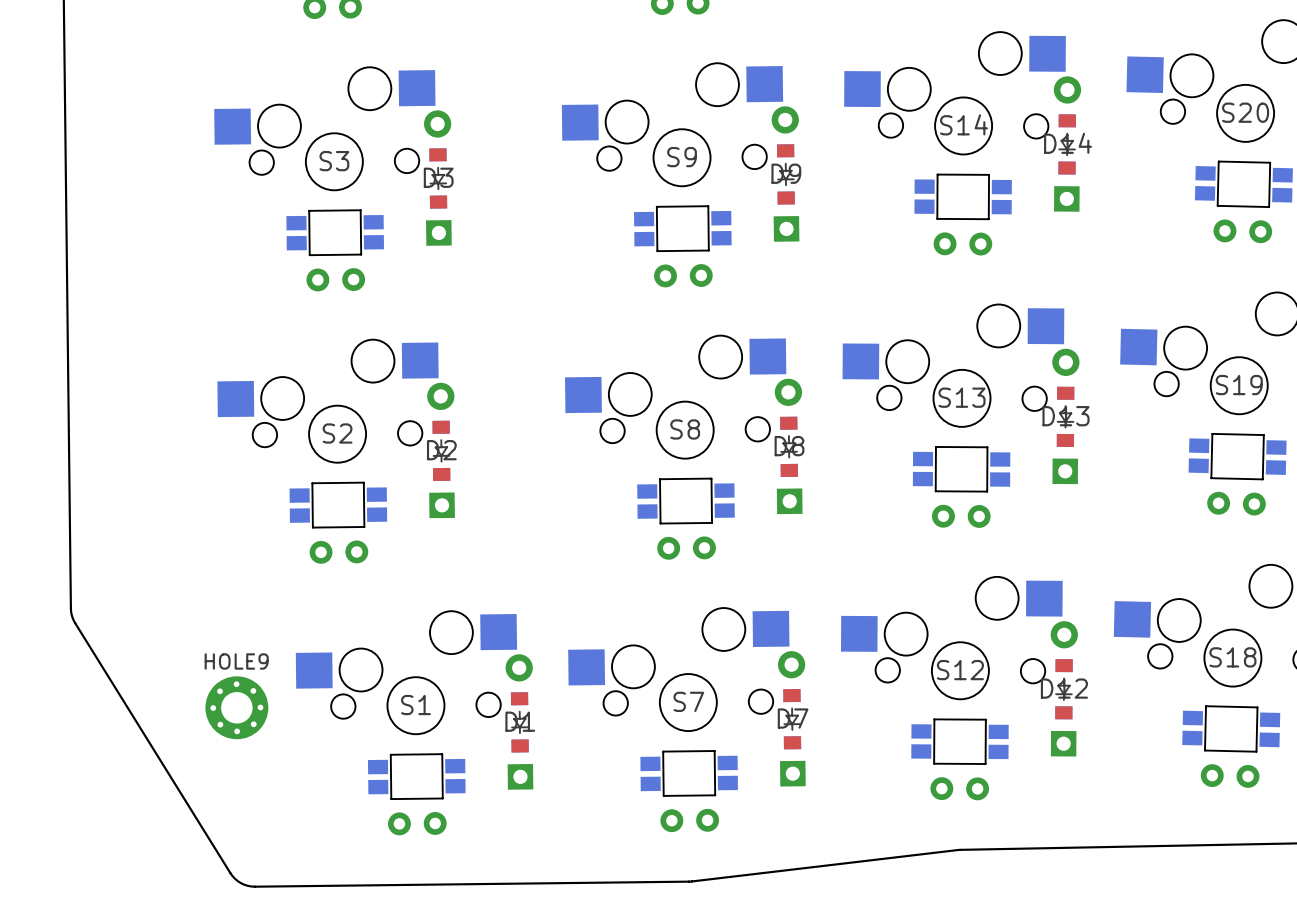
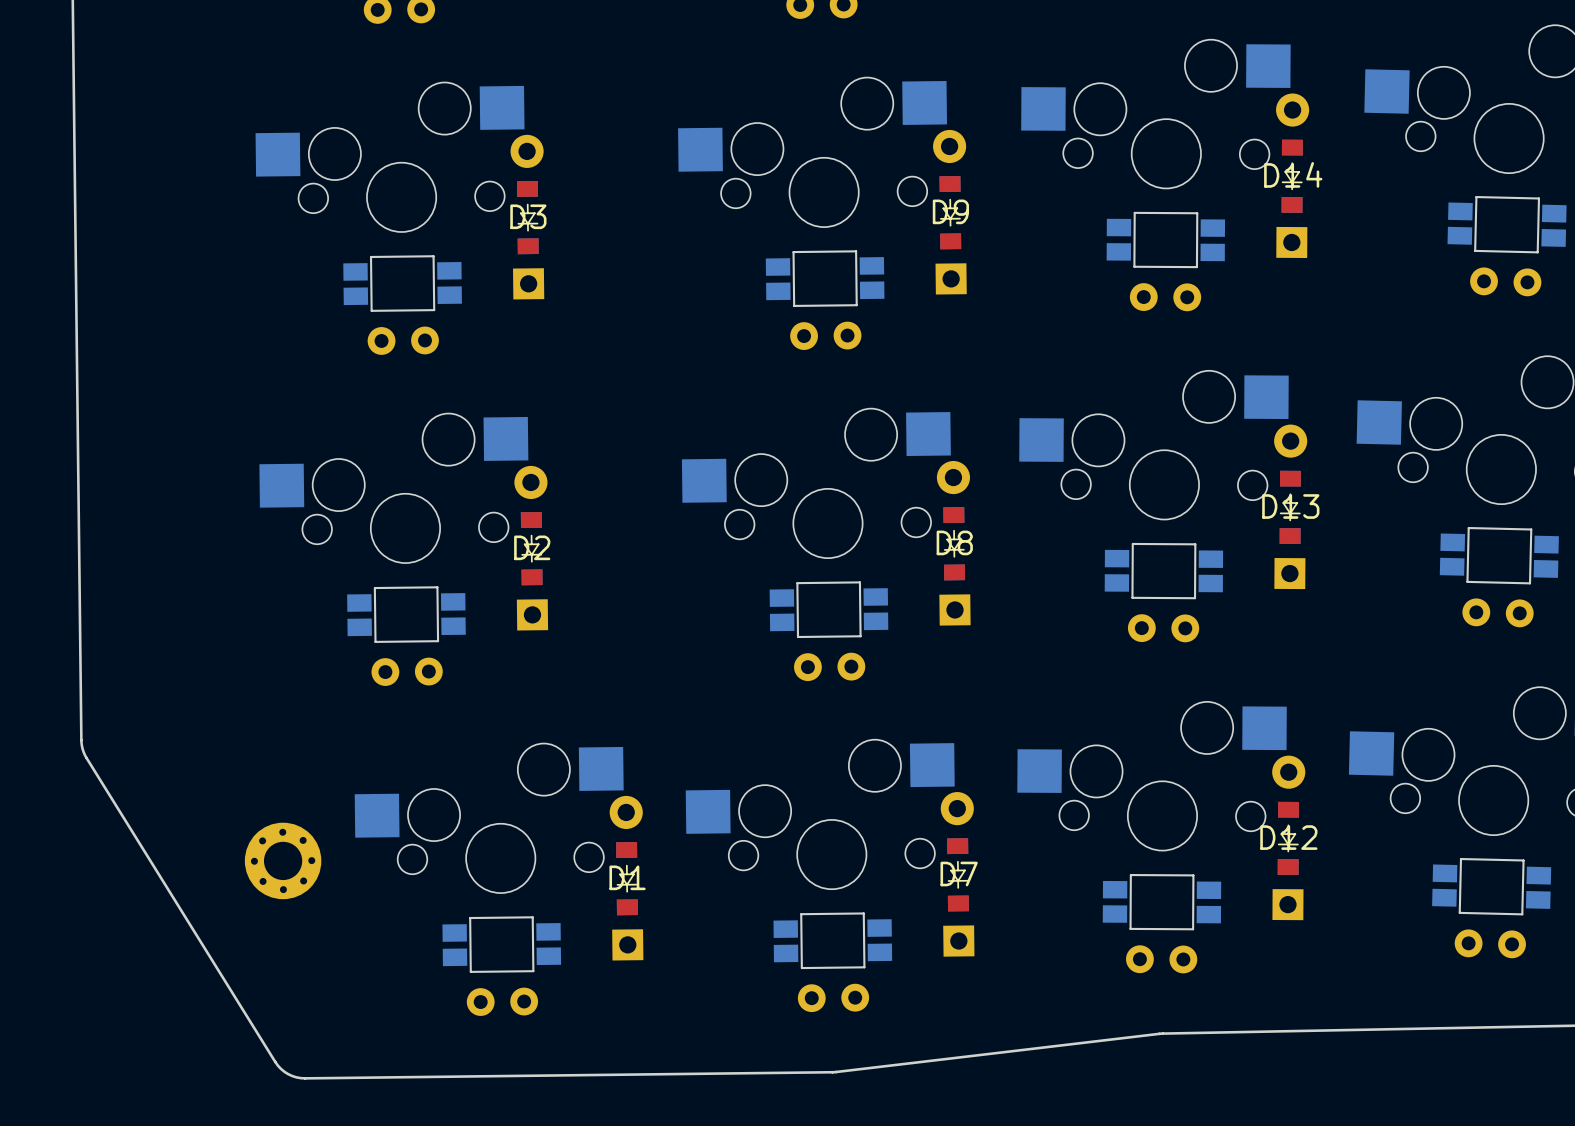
S20 name: S20 (1245, 112) -> none
S14 name: S14 (964, 124) -> none
S9 name: S9 (682, 157) -> none
S3 name: S3 (334, 161) -> none
S19 name: S19 (1239, 385) -> none
S13 name: S13 (962, 397) -> none
S8 name: S8 (685, 429) -> none
S2 name: S2 (337, 433) -> none
S18 name: S18 (1232, 657) -> none
HOLE9 name: HOLE9 (236, 661) -> none
S12 name: S12 (960, 670) -> none
S7 name: S7 (688, 701) -> none
S1 name: S1 (415, 705) -> none

